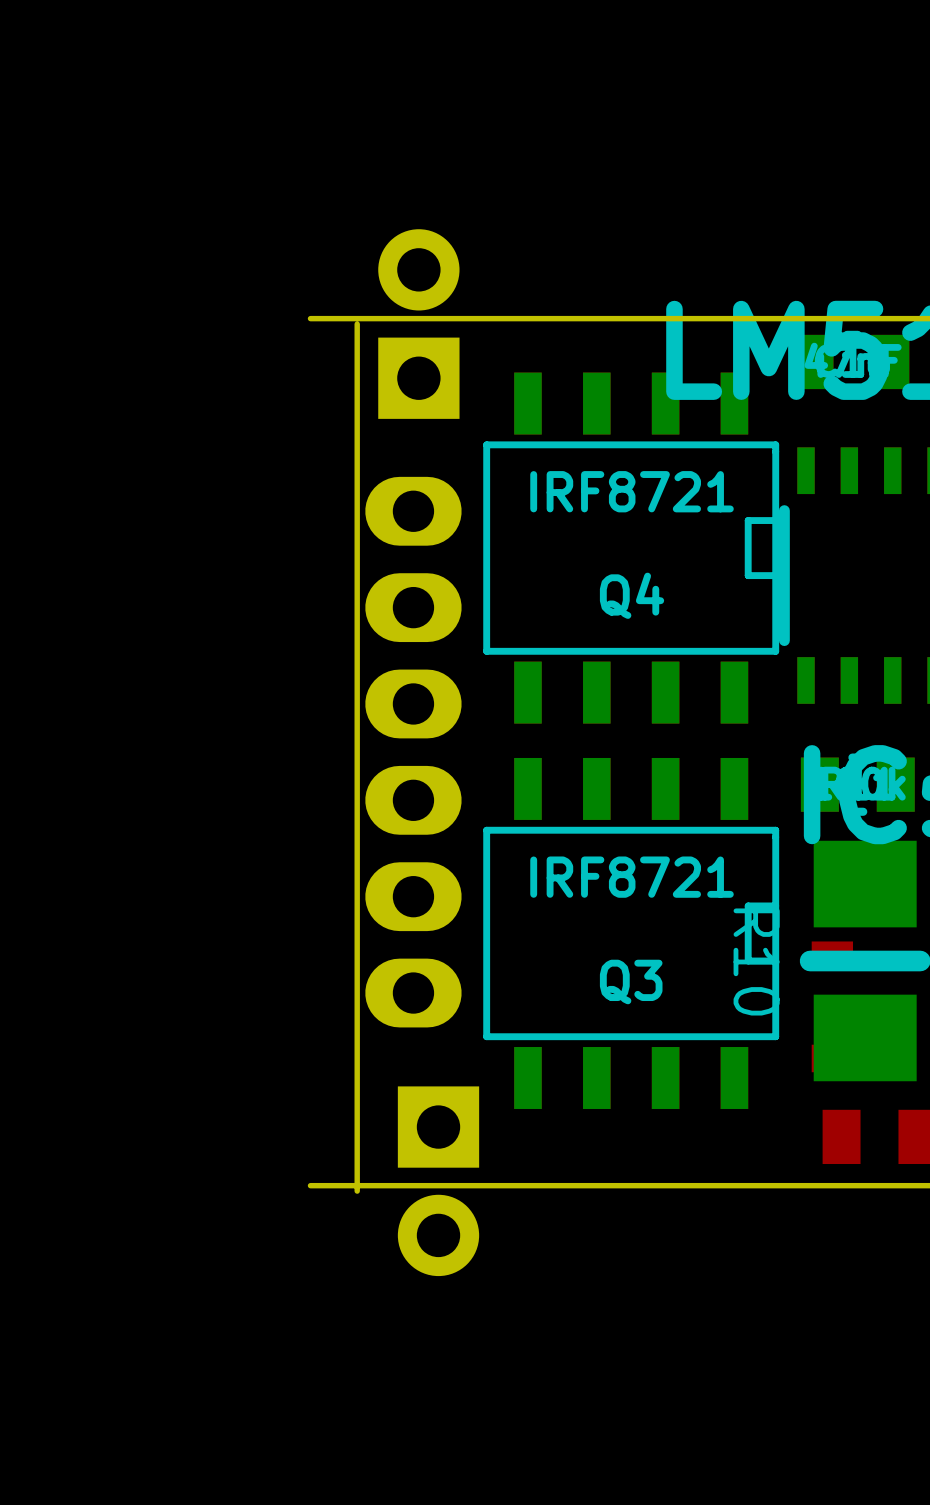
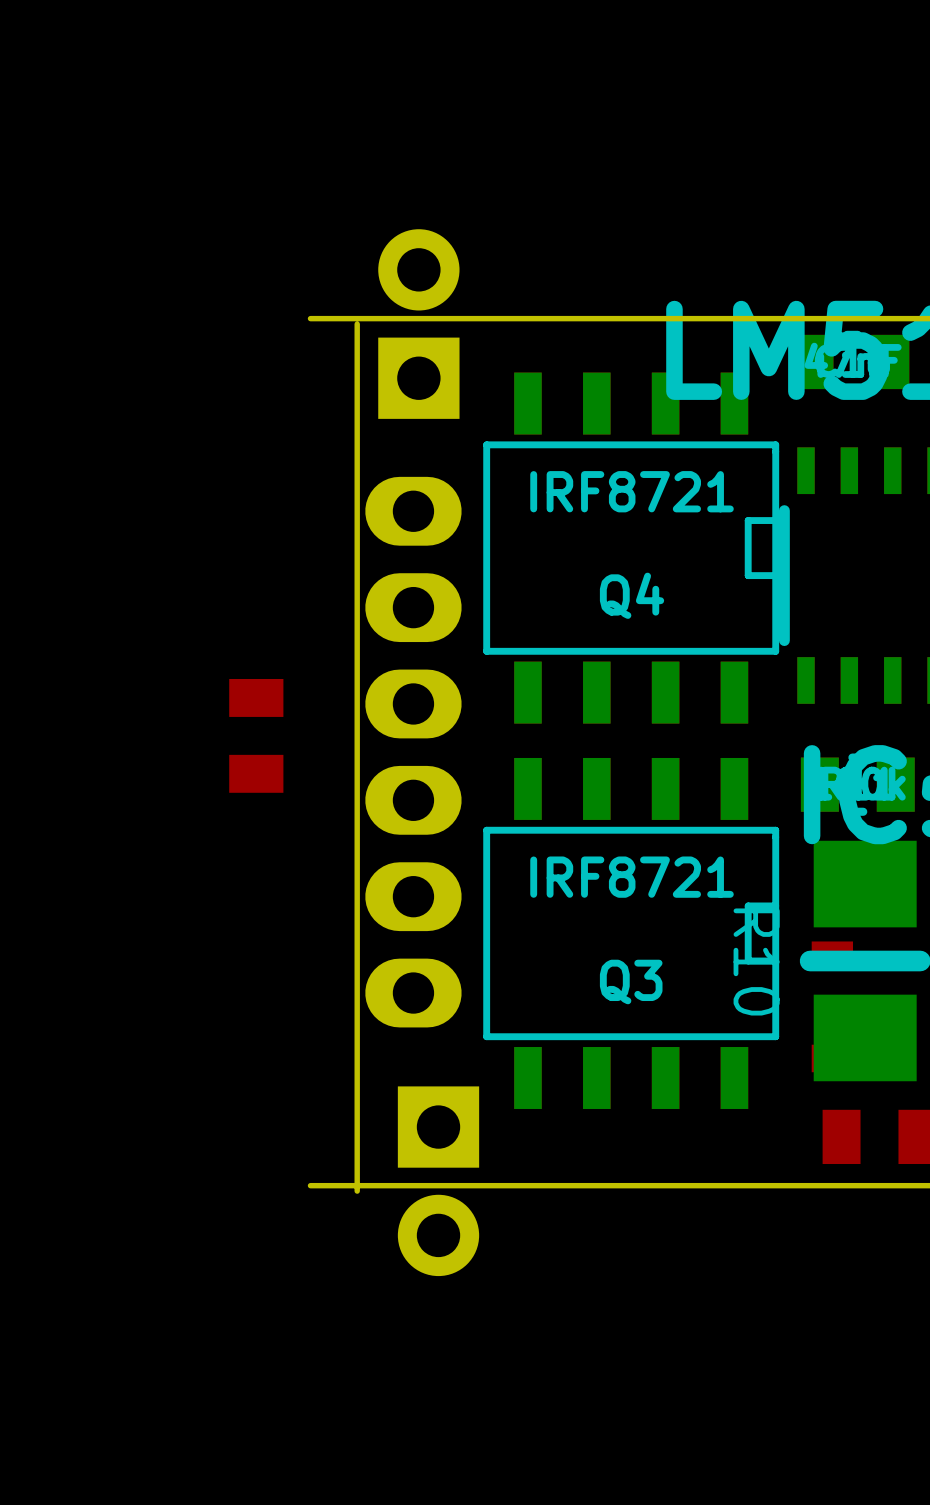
part: none -> (256, 735)

